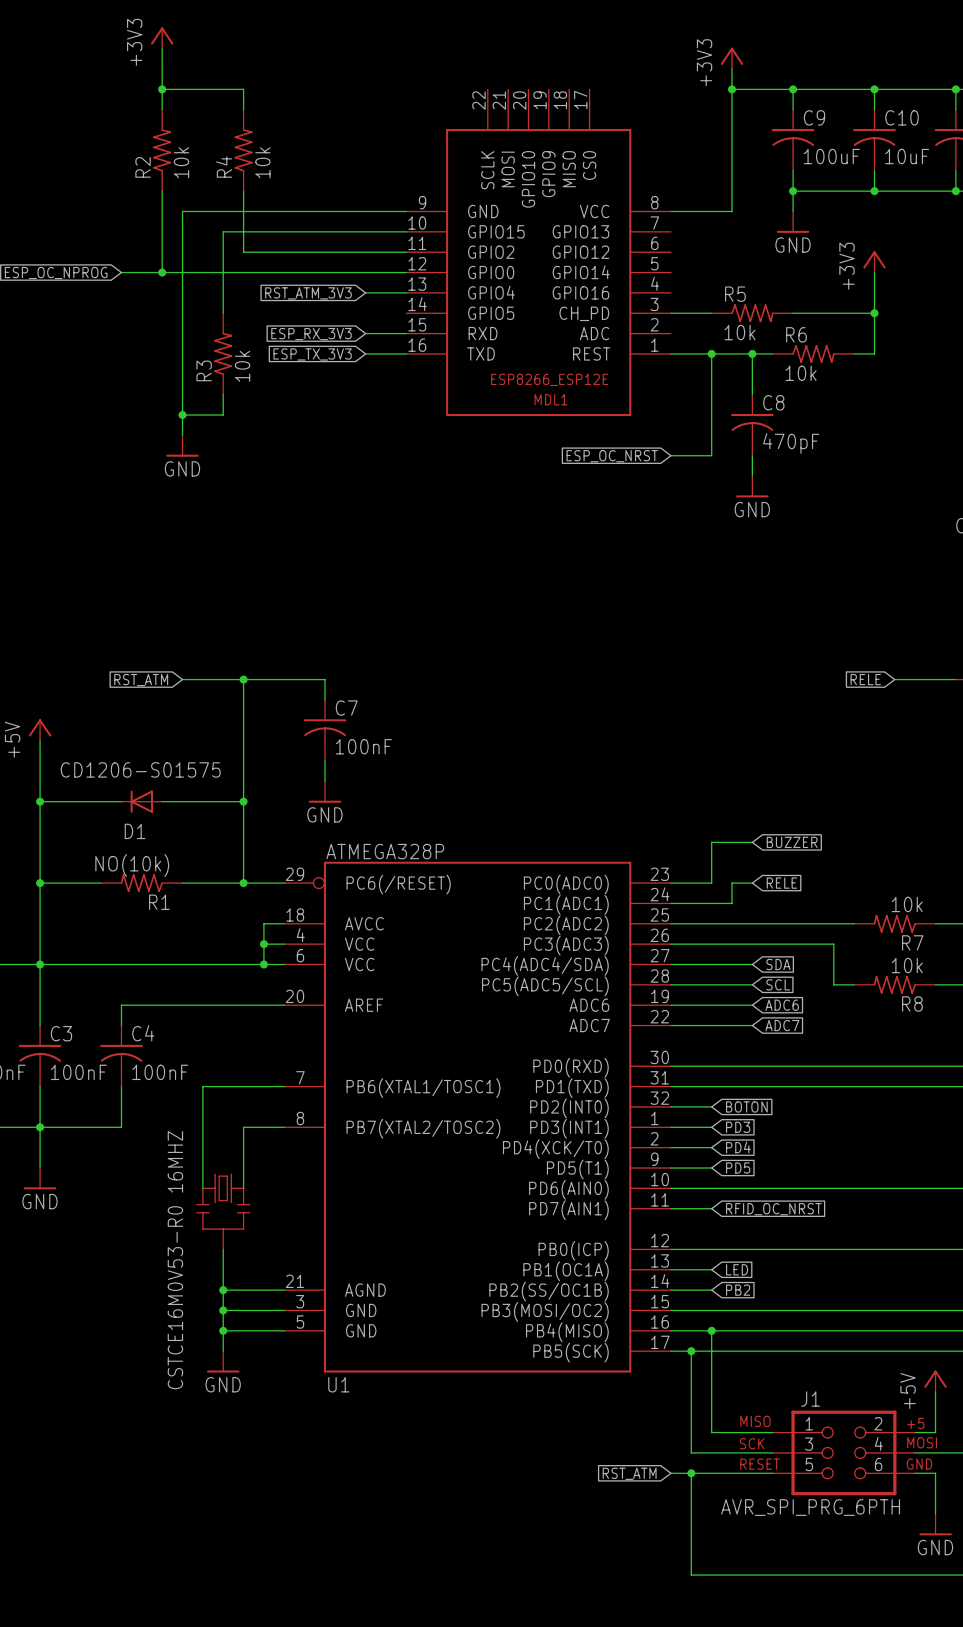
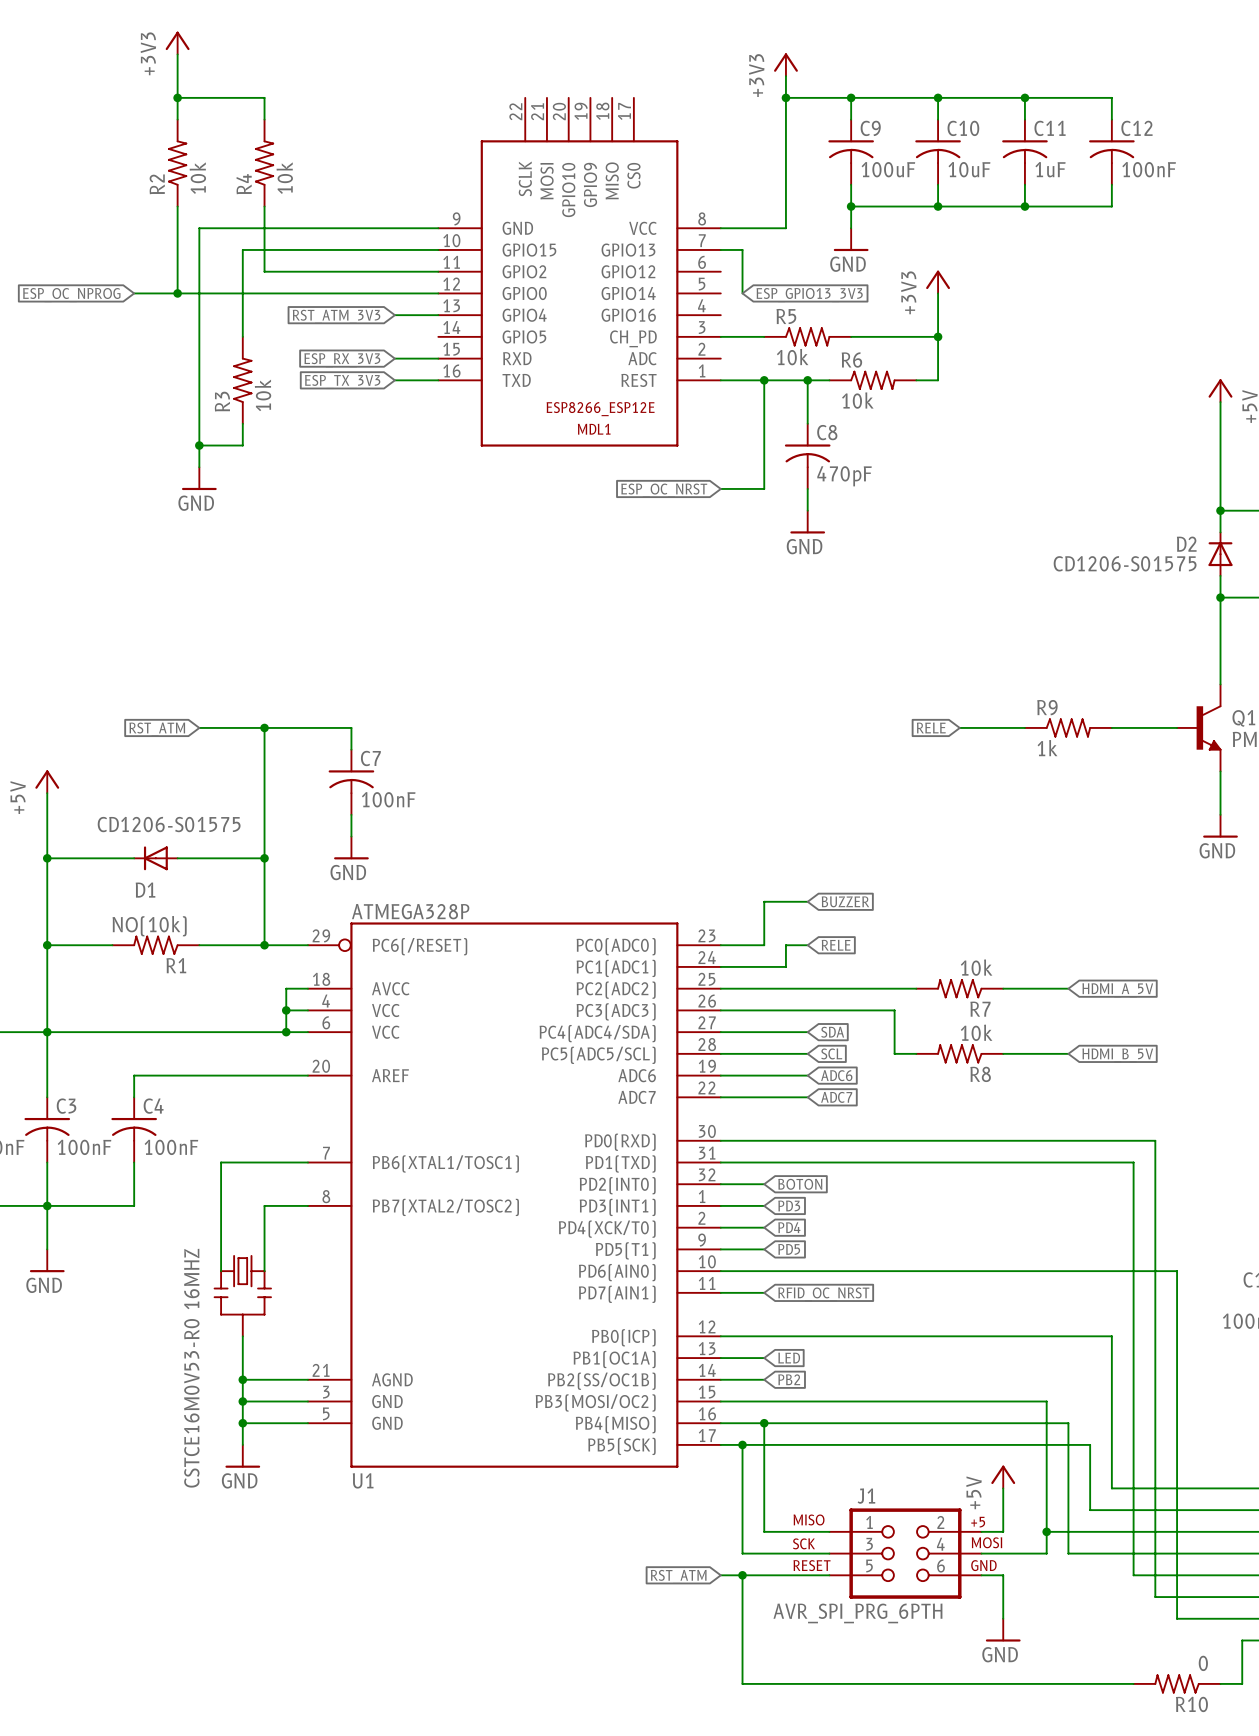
wire: none -> (720, 249) (742, 249) (742, 293)
global label: none -> ESP_GPIO13_3V3 (809, 295)

